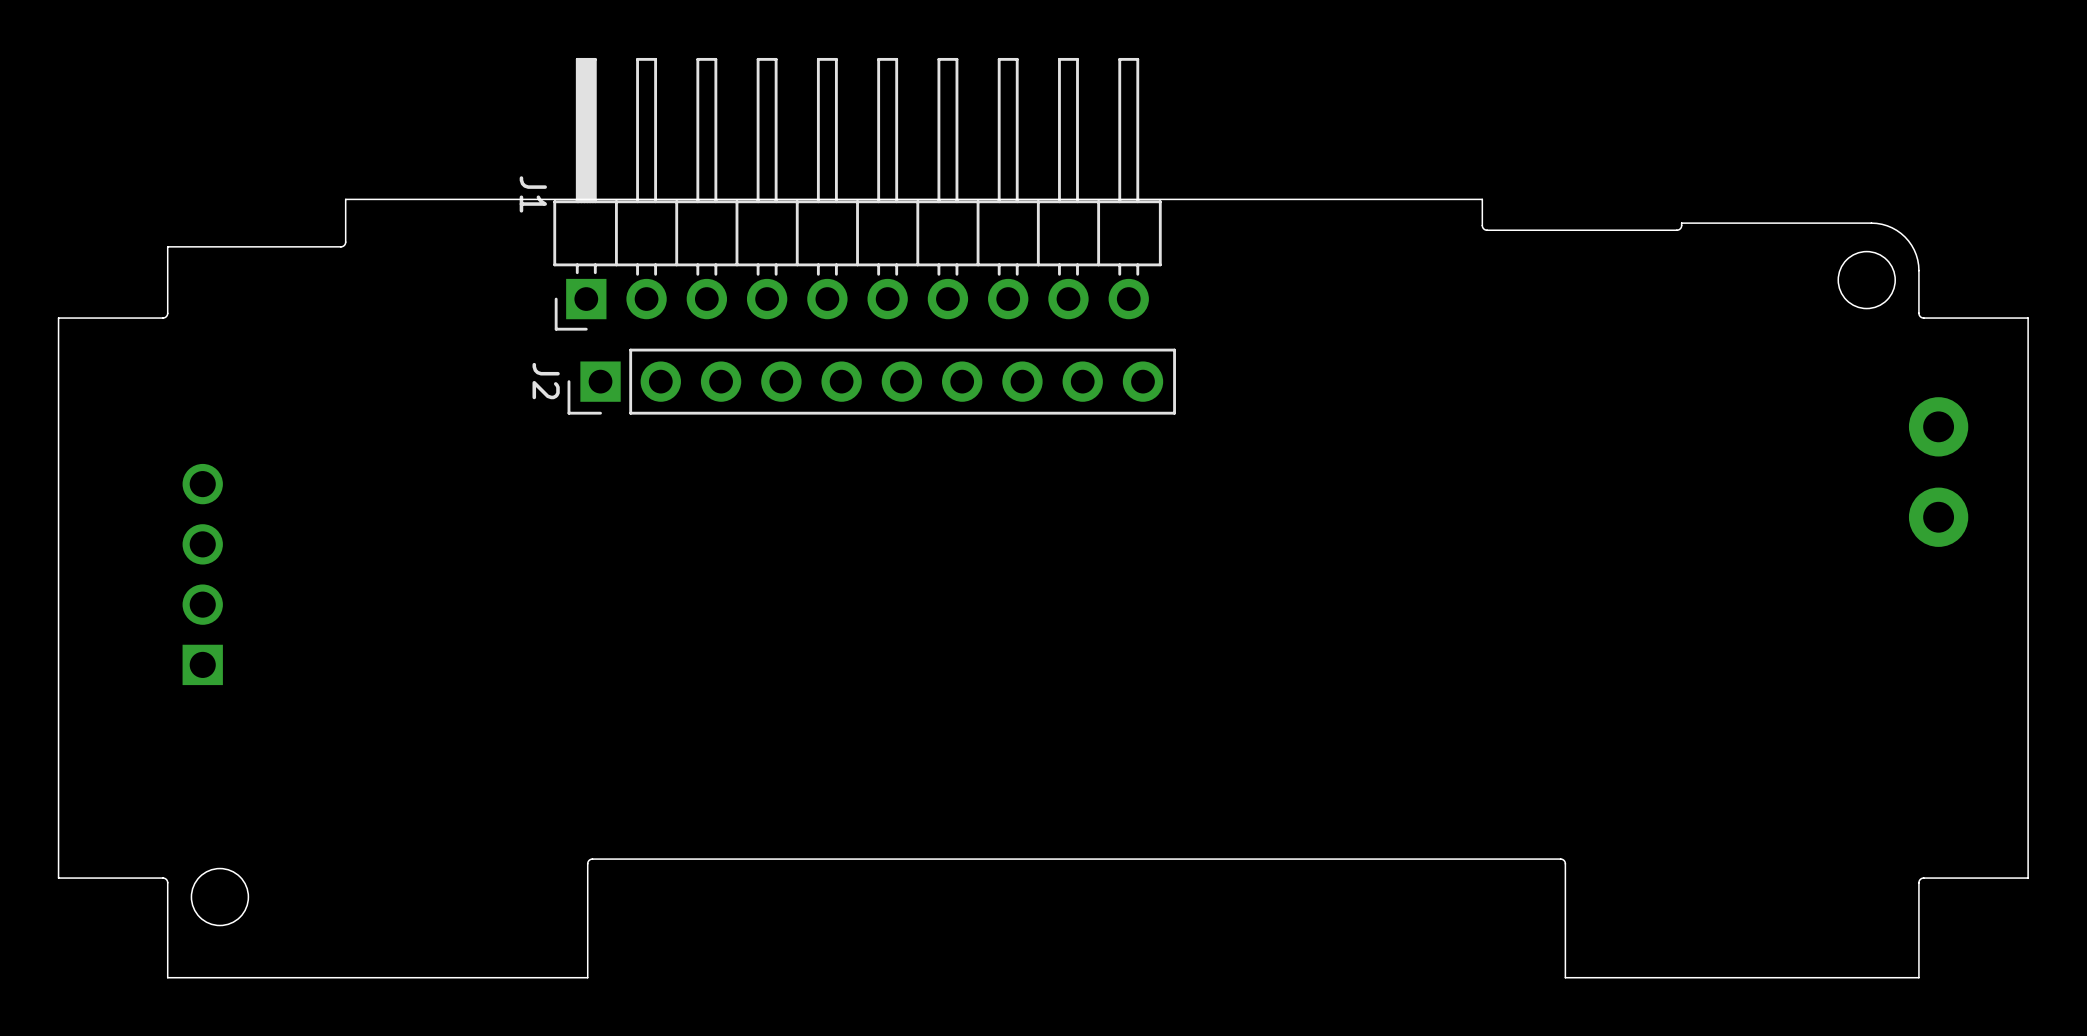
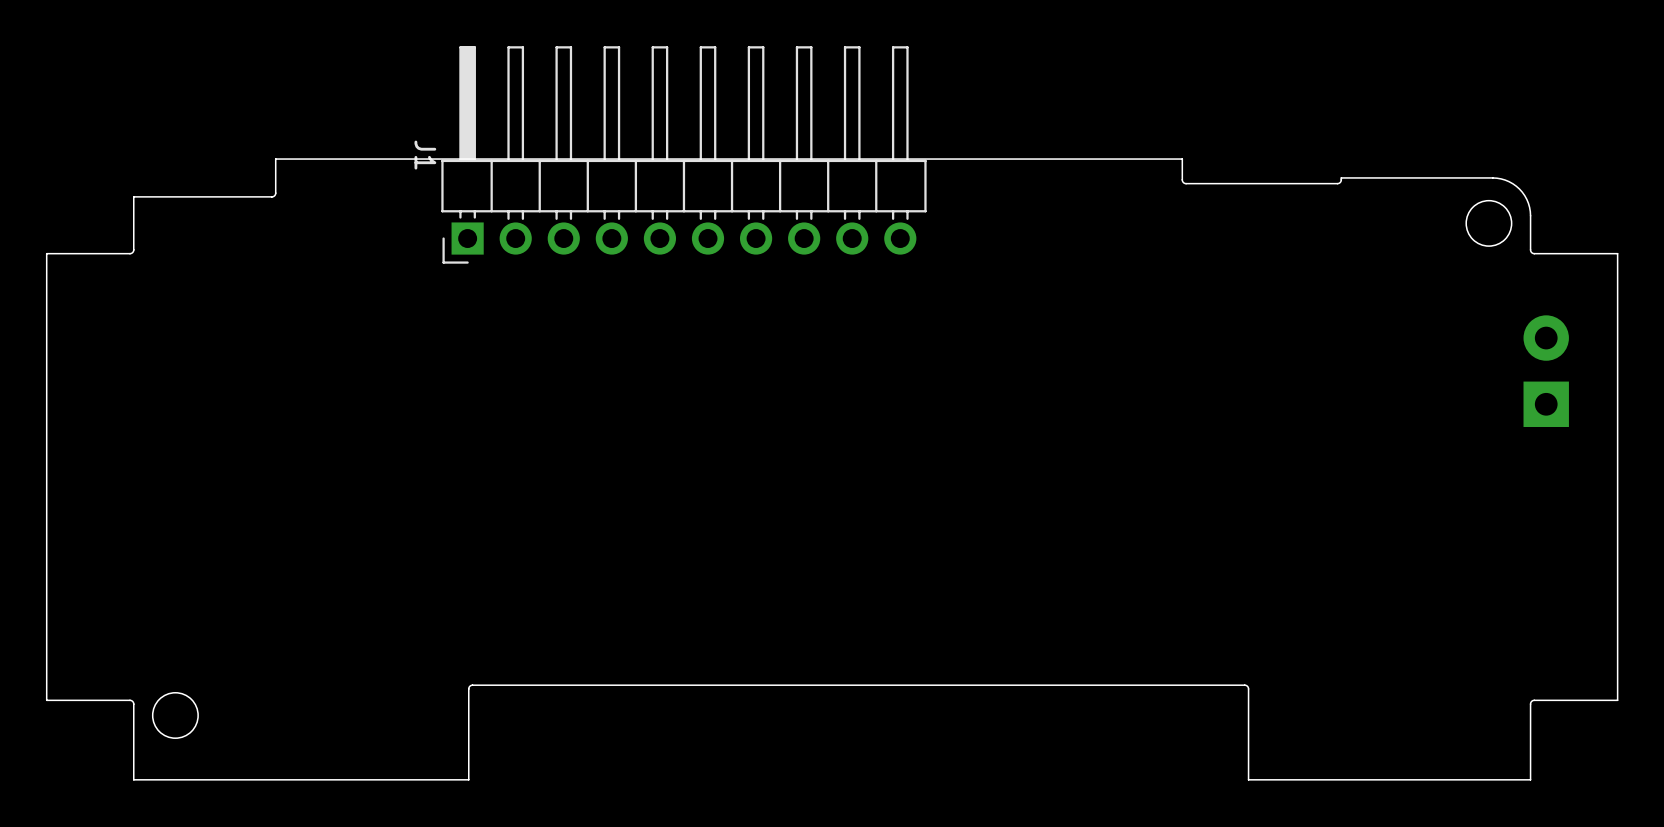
J2: (871, 381) -> none
part footprint: [1908, 397, 1969, 547] -> [1523, 315, 1569, 428]
part: (202, 574) -> none

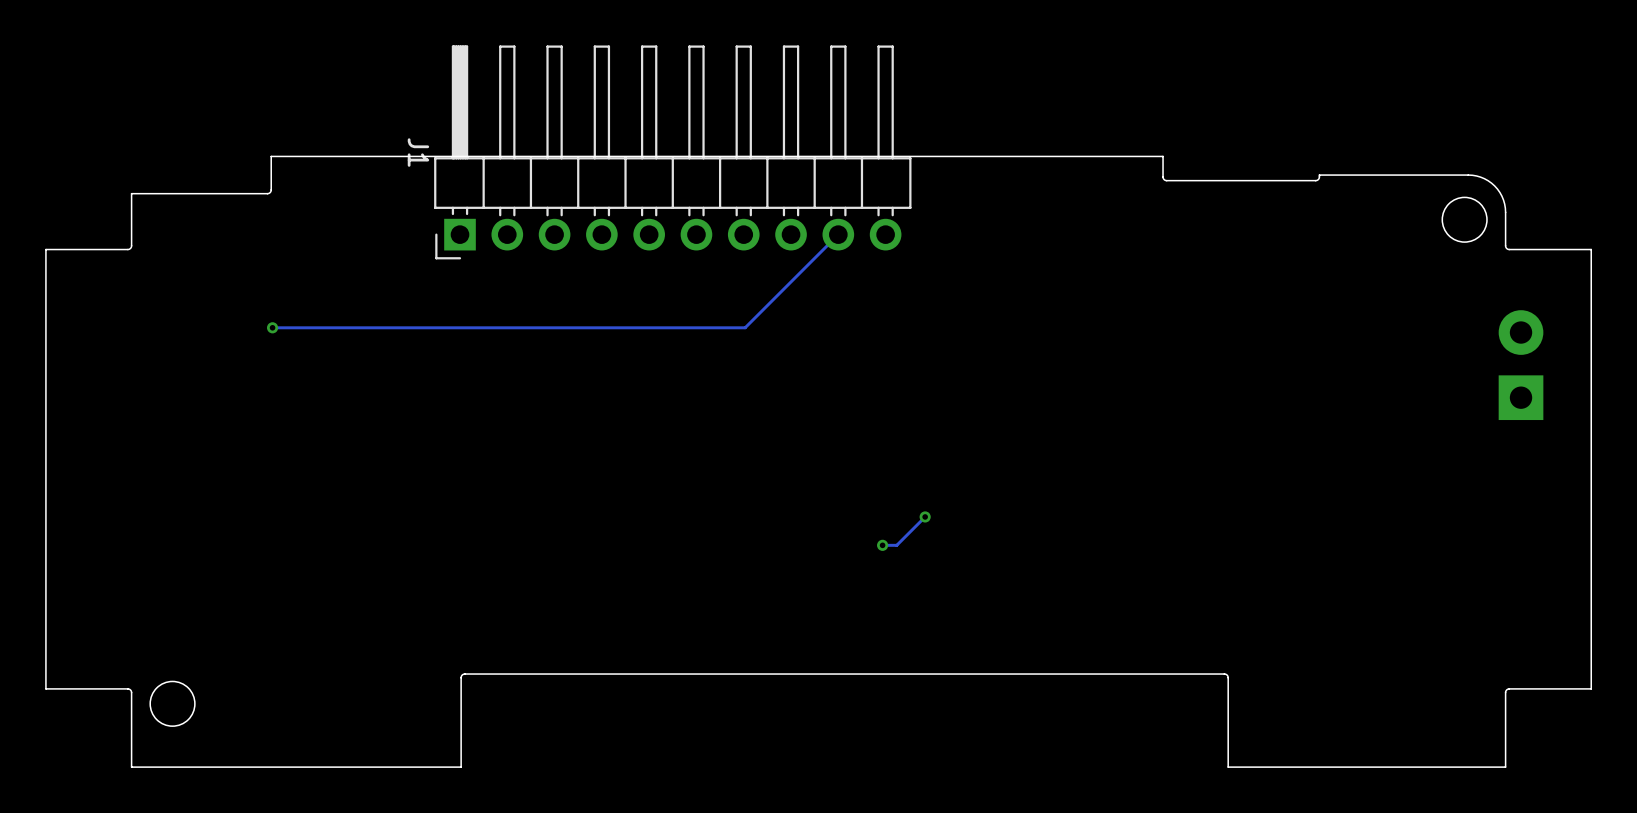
track: none -> (838, 234) (745, 327) (272, 327)
via: none -> (272, 327)
track: none -> (925, 516) (896, 545) (882, 545)
via: none -> (925, 516)
via: none -> (882, 545)

